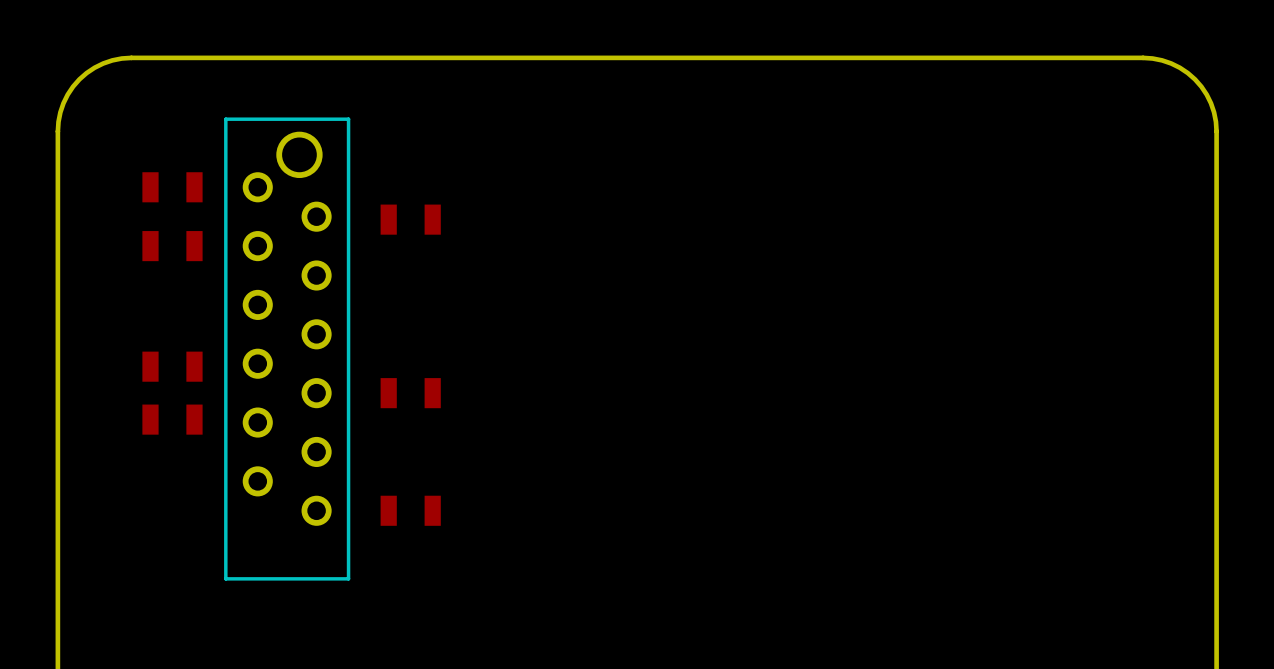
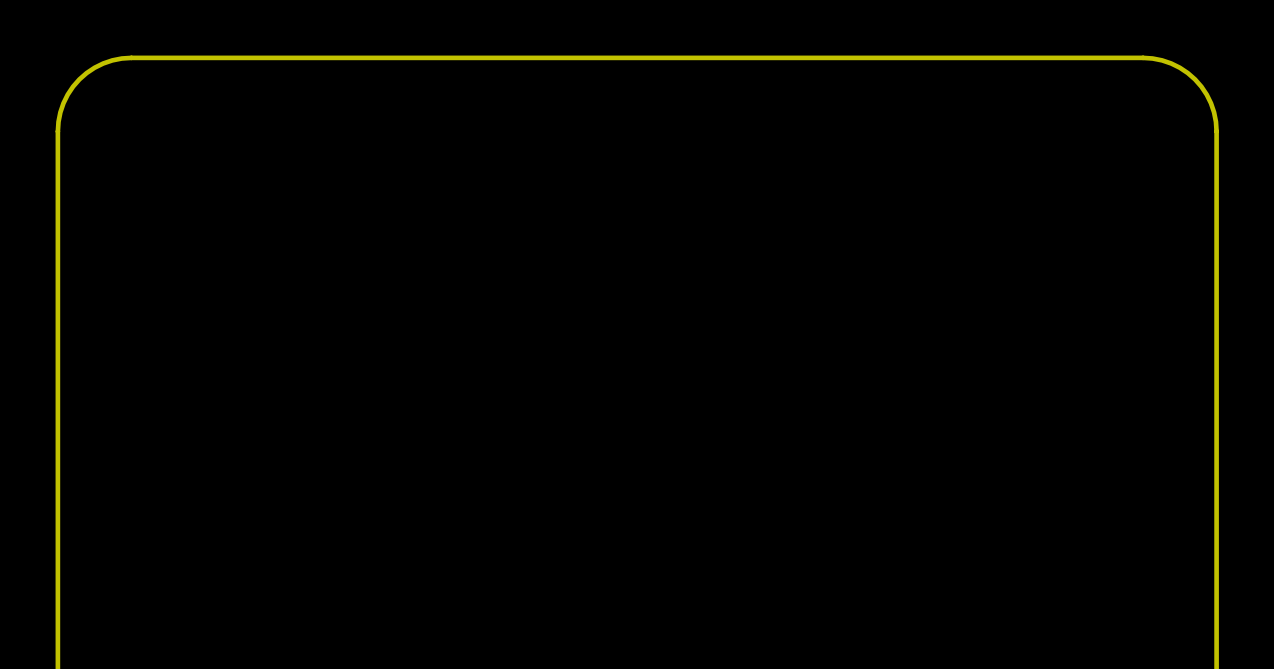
part: (172, 187) -> none
part: (410, 219) -> none
part: (172, 246) -> none
part: (287, 349) -> none
part: (172, 366) -> none
part: (410, 393) -> none
part: (172, 419) -> none
part: (410, 510) -> none

